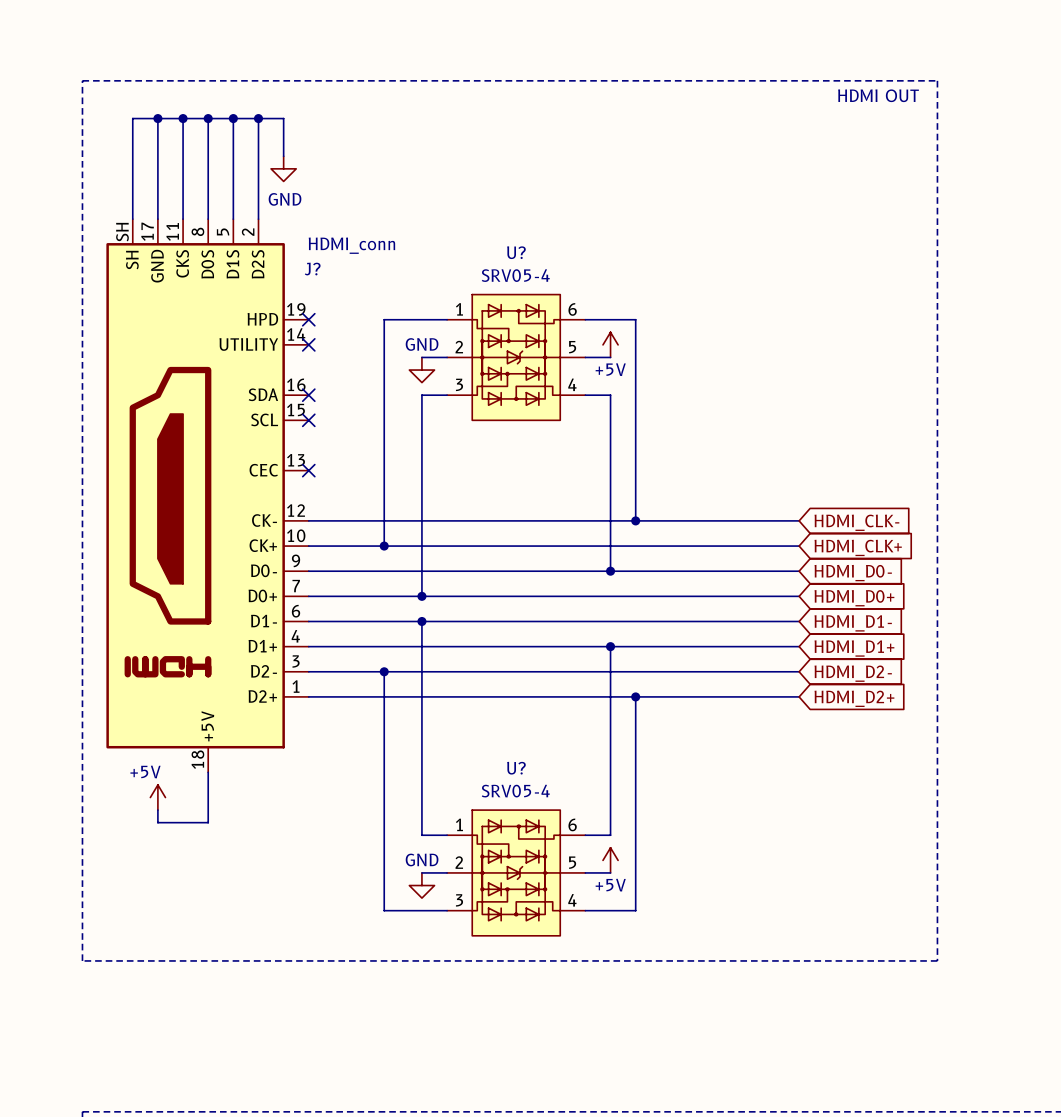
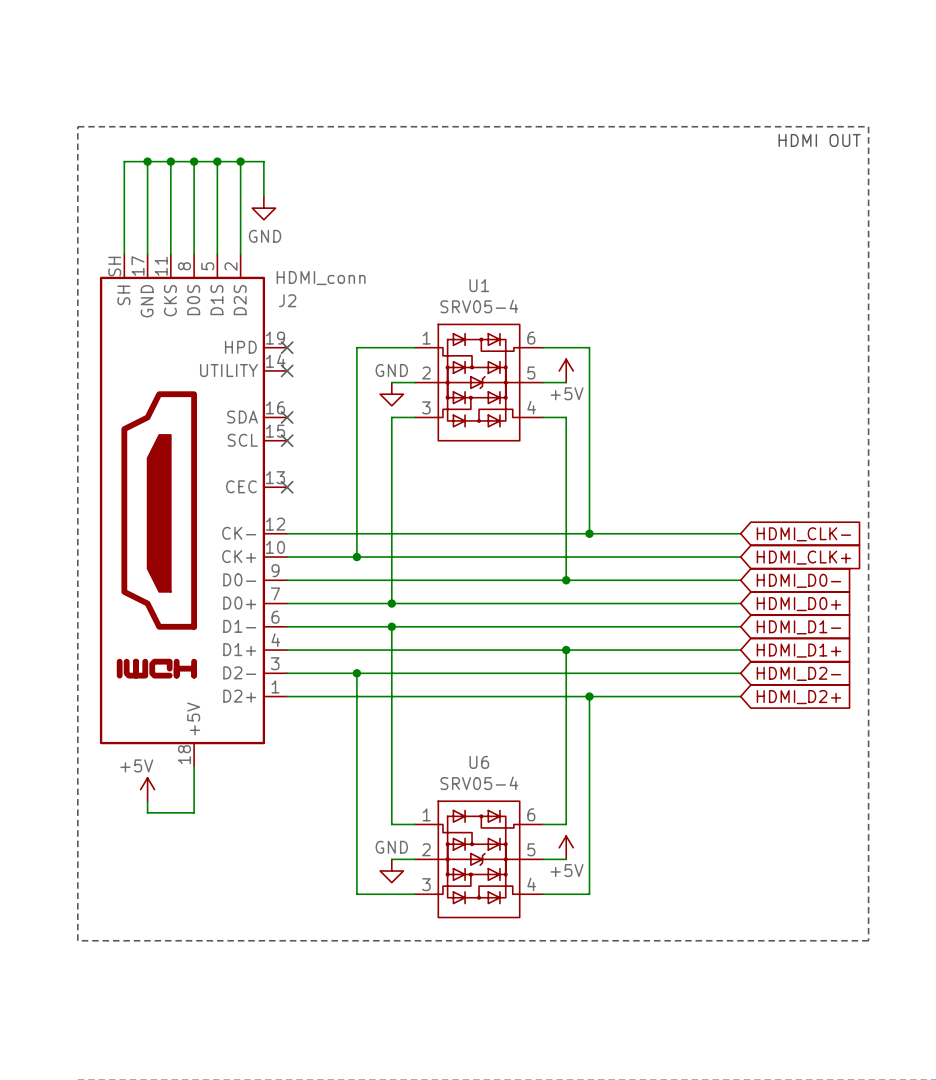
U? name: U? (516, 252) -> U1 (479, 285)
J? name: J? (312, 269) -> J2 (287, 300)
U? name: U? (516, 768) -> U6 (479, 762)

